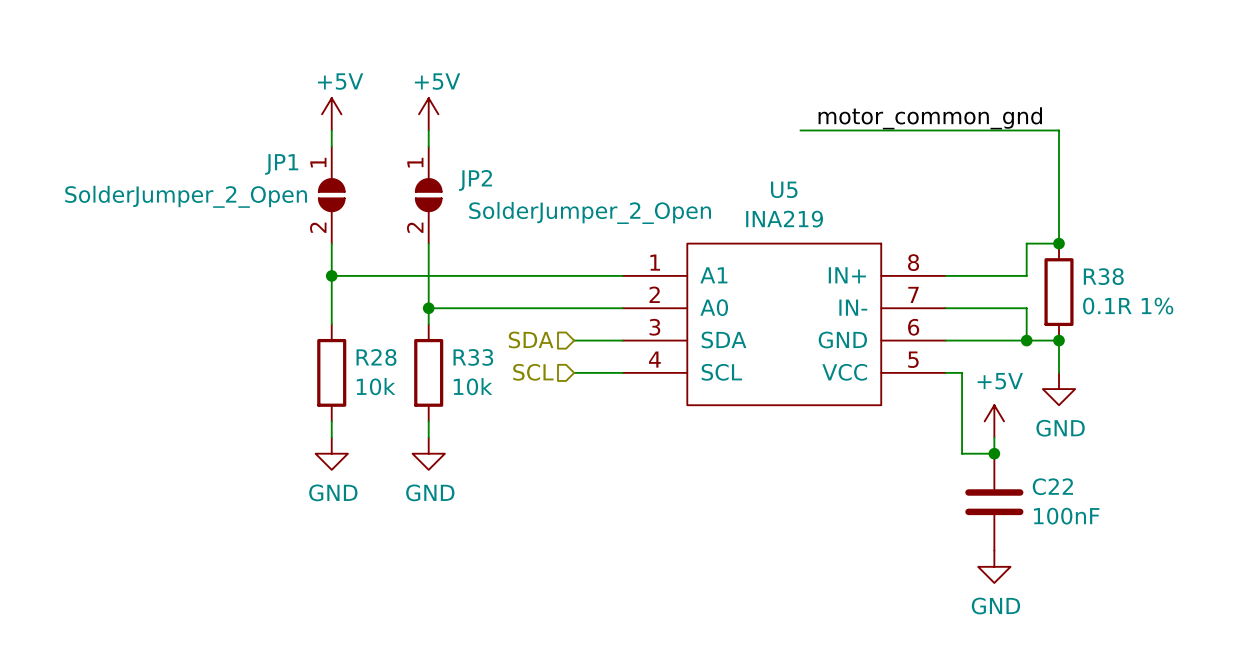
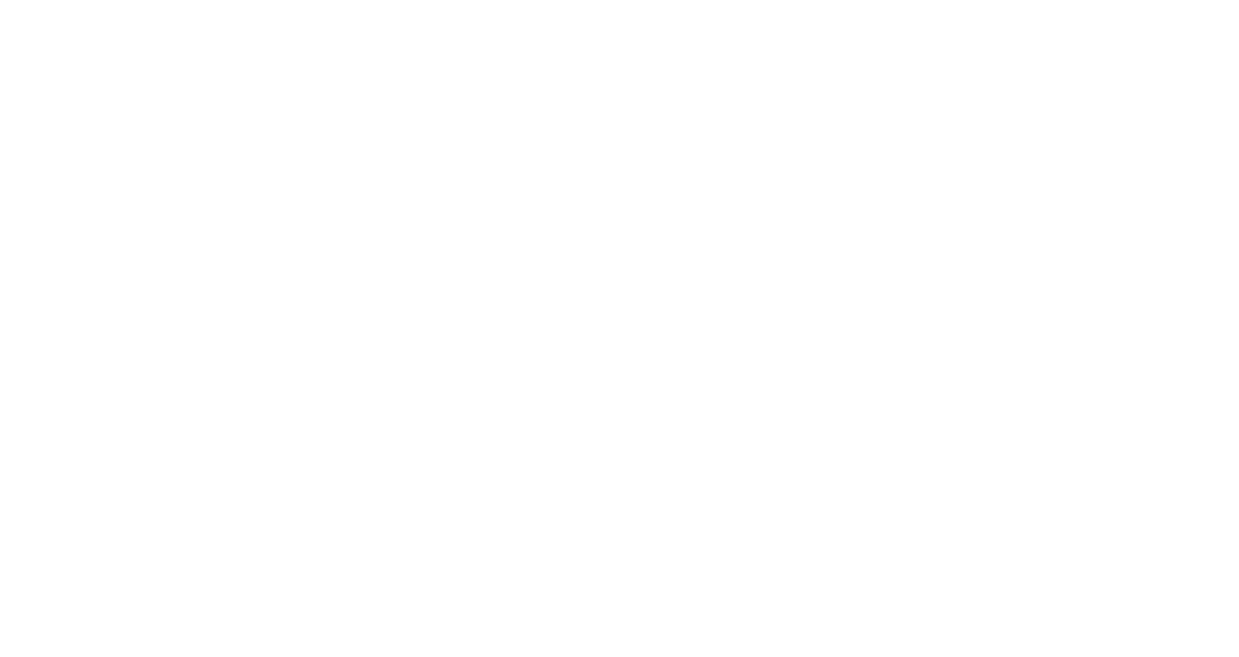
power symbol: +5V (331, 114) -> none
power symbol: +5V (428, 114) -> none
label: motor_common_gnd (930, 118) -> none
wire: (331, 130) (331, 146) -> none
wire: (428, 130) (428, 146) -> none
wire: (800, 130) (1059, 130) (1059, 243) (1026, 243) (1026, 275) (945, 275) -> none
JP1: SolderJumper_2_Open (331, 195) -> none
JP2: SolderJumper_2_Open (428, 195) -> none
wire: (331, 243) (331, 324) -> none
wire: (428, 243) (428, 324) -> none
junction: (1059, 243) -> none
wire: (331, 275) (622, 275) -> none
junction: (331, 275) -> none
R38: 0.1R 1% (1059, 292) -> none
wire: (428, 308) (622, 308) -> none
junction: (428, 308) -> none
wire: (945, 308) (1026, 308) (1026, 340) -> none
U5: INA219 (784, 324) -> none
hierarchical label: SDA (531, 339) -> none
wire: (574, 340) (622, 340) -> none
wire: (945, 340) (1059, 340) (1059, 372) -> none
junction: (1026, 340) -> none
junction: (1059, 340) -> none
R28: 10k (331, 372) -> none
R33: 10k (428, 372) -> none
hierarchical label: SCL (533, 372) -> none
wire: (574, 372) (622, 372) -> none
wire: (945, 372) (962, 372) (962, 453) (994, 453) (994, 437) -> none
power symbol: GND (1059, 389) -> none
wire: (331, 421) (331, 437) -> none
wire: (428, 421) (428, 437) -> none
power symbol: +5V (994, 421) -> none
power symbol: GND (331, 453) -> none
power symbol: GND (428, 453) -> none
junction: (994, 453) -> none
C22: 100nF (994, 502) -> none
power symbol: GND (994, 566) -> none

